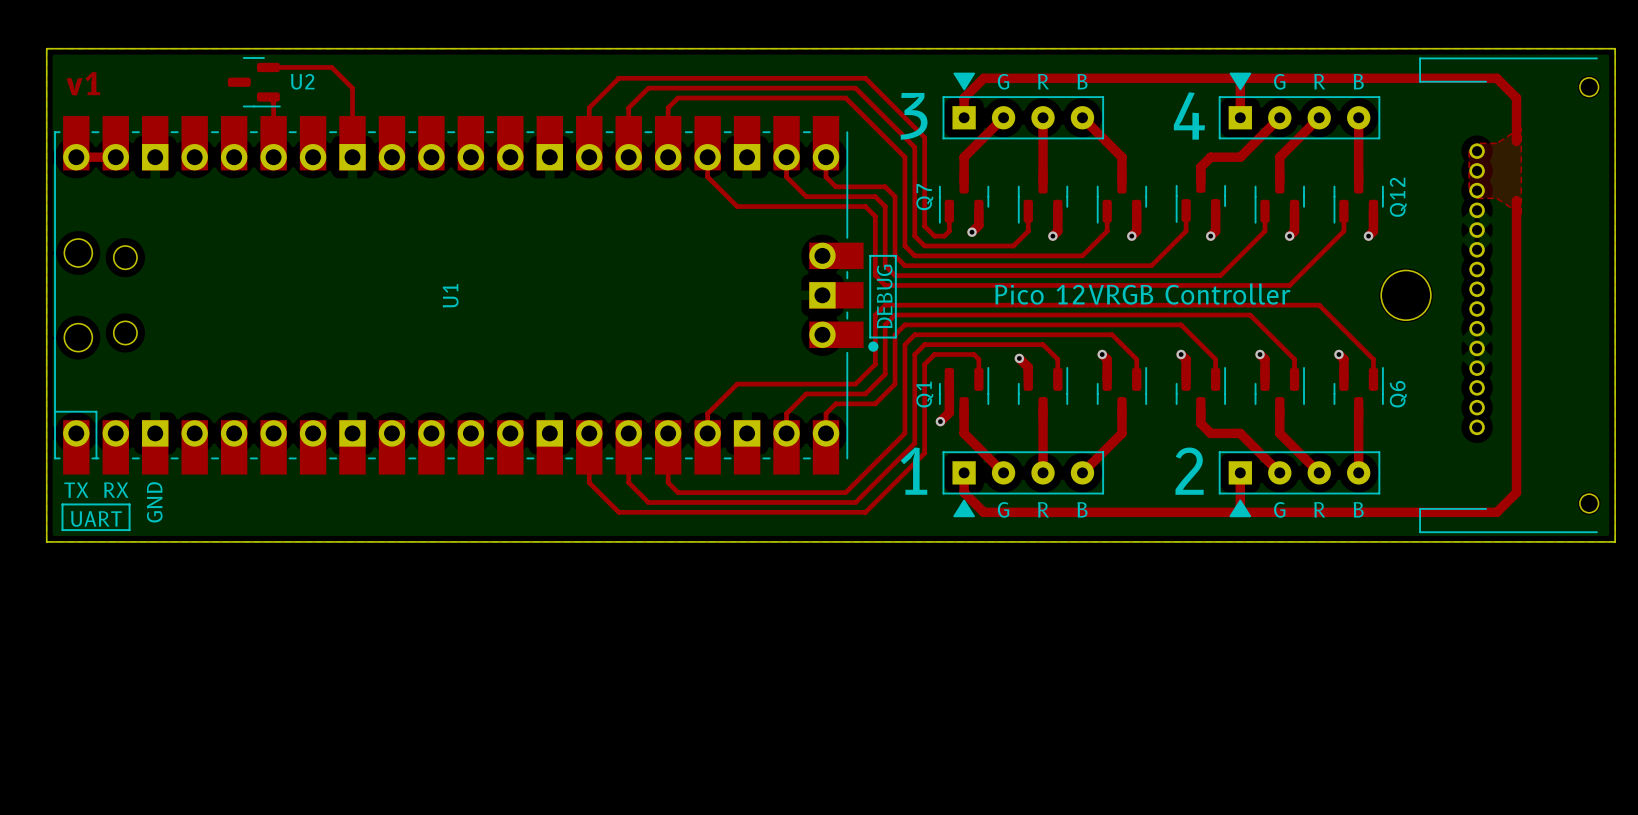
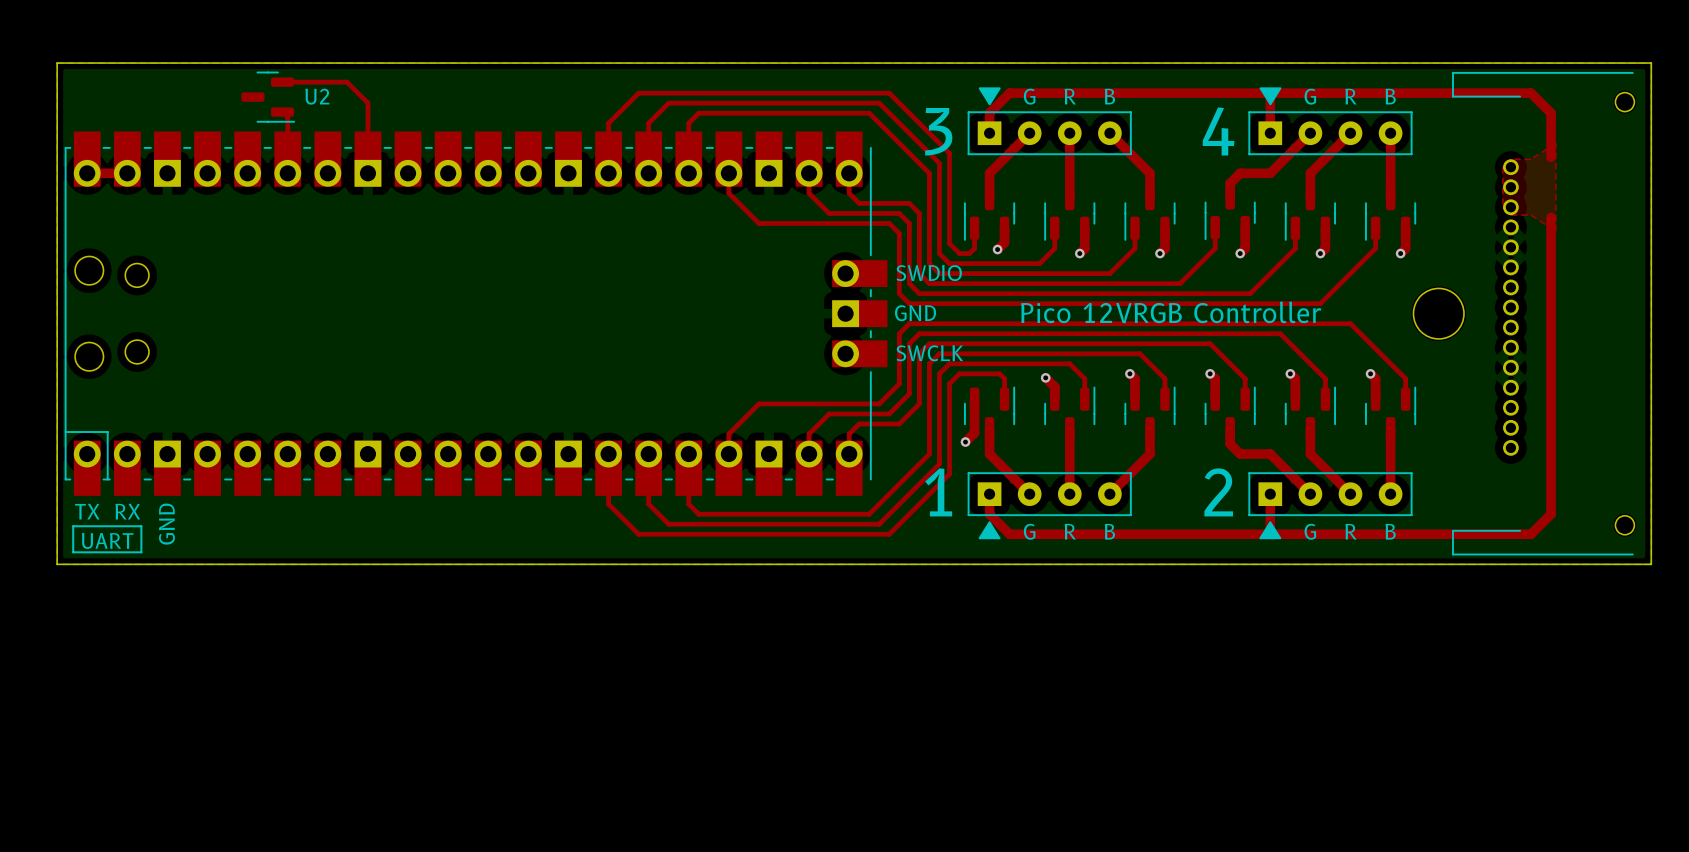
text: v1 (83, 83) -> none
Q7 name: Q7 (924, 197) -> none
Q12 name: Q12 (1398, 197) -> none
line: (870, 255) (895, 255) (895, 337) (870, 337) (870, 255) -> none
text: none -> SWDIO (929, 273)
U1 name: U1 (450, 295) -> none
text: DEBUG (884, 296) -> GND (915, 313)
text: none -> SWCLK (929, 353)
drawing: [868, 341, 879, 352] -> none
Q1 name: Q1 (924, 394) -> none
Q6 name: Q6 (1398, 394) -> none

